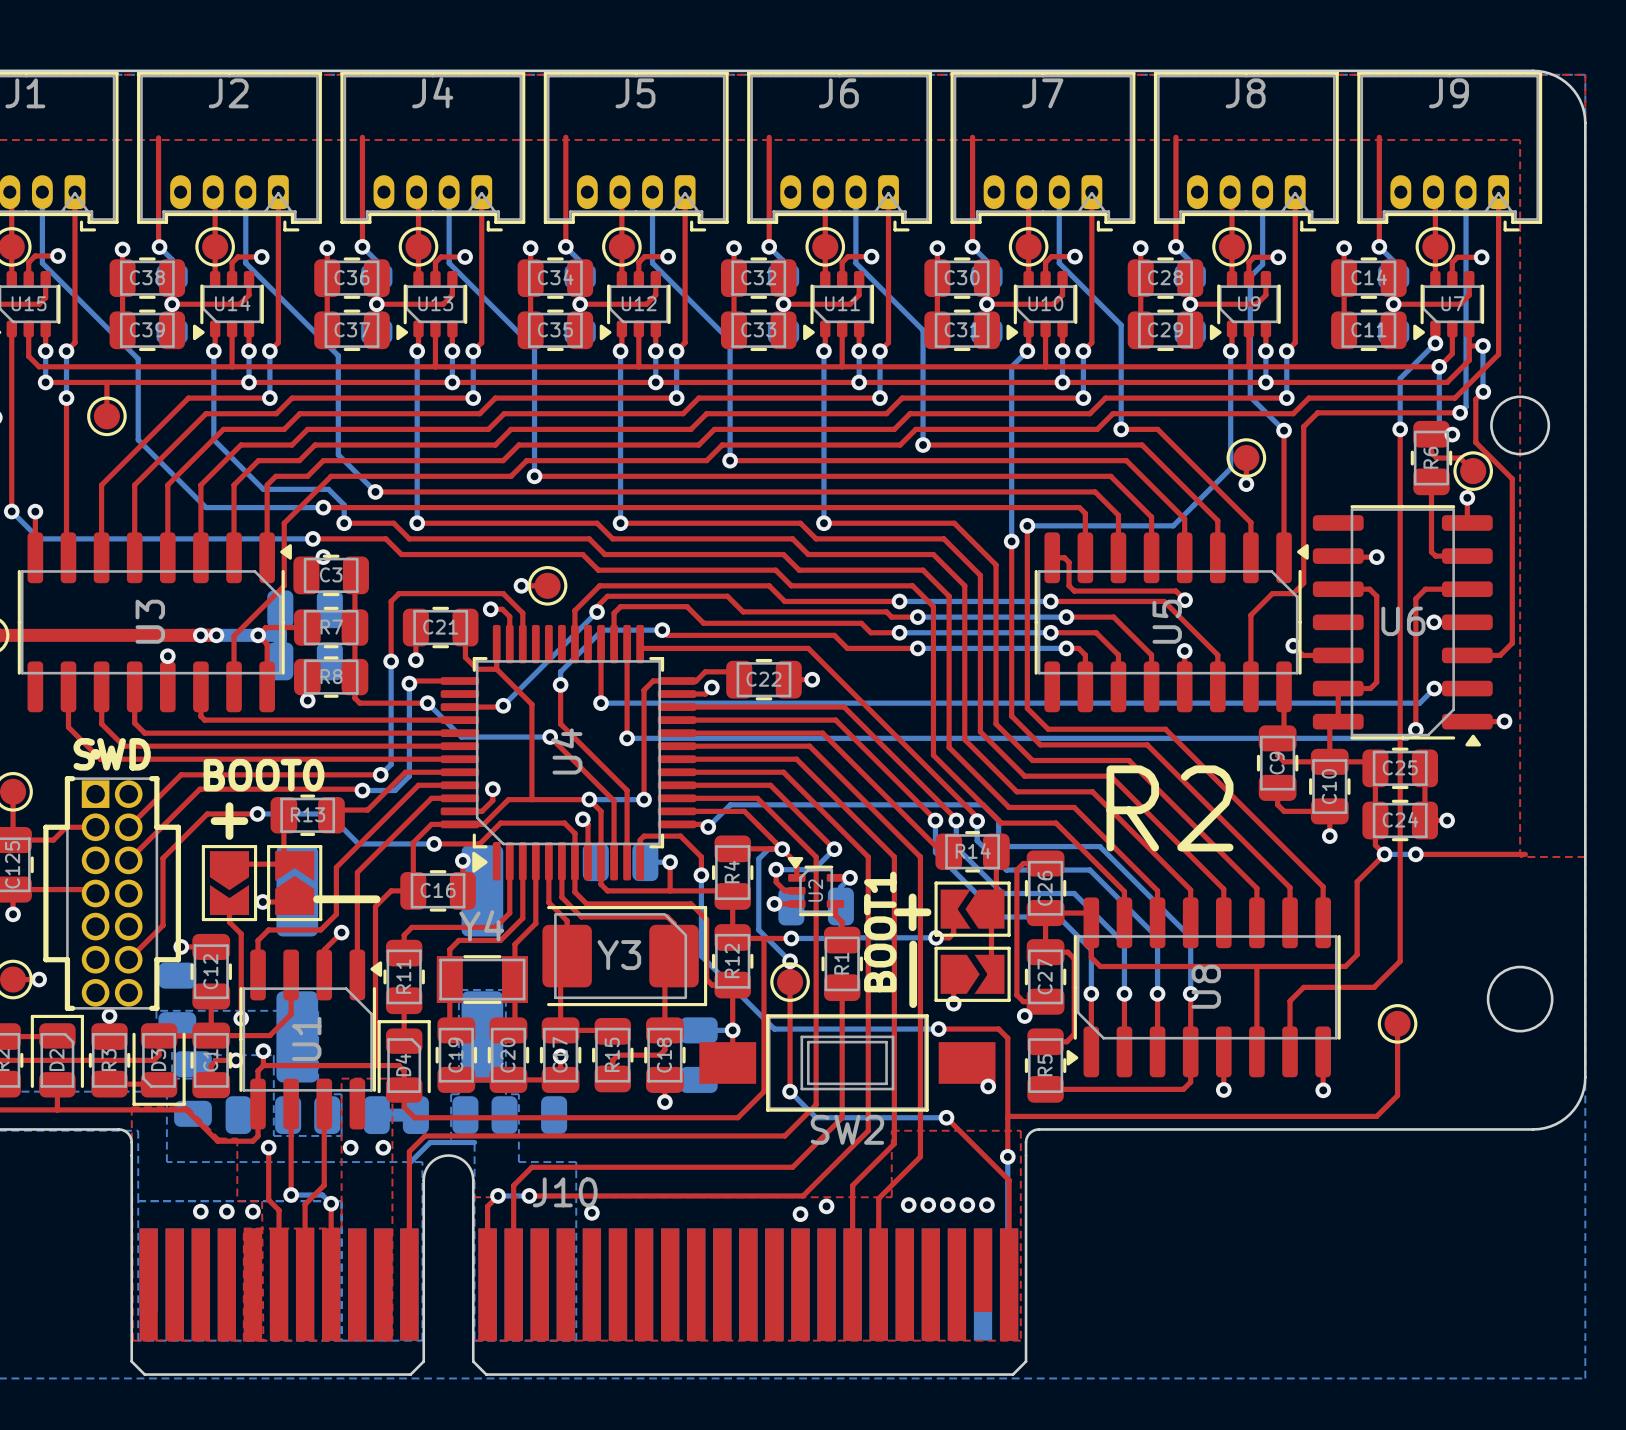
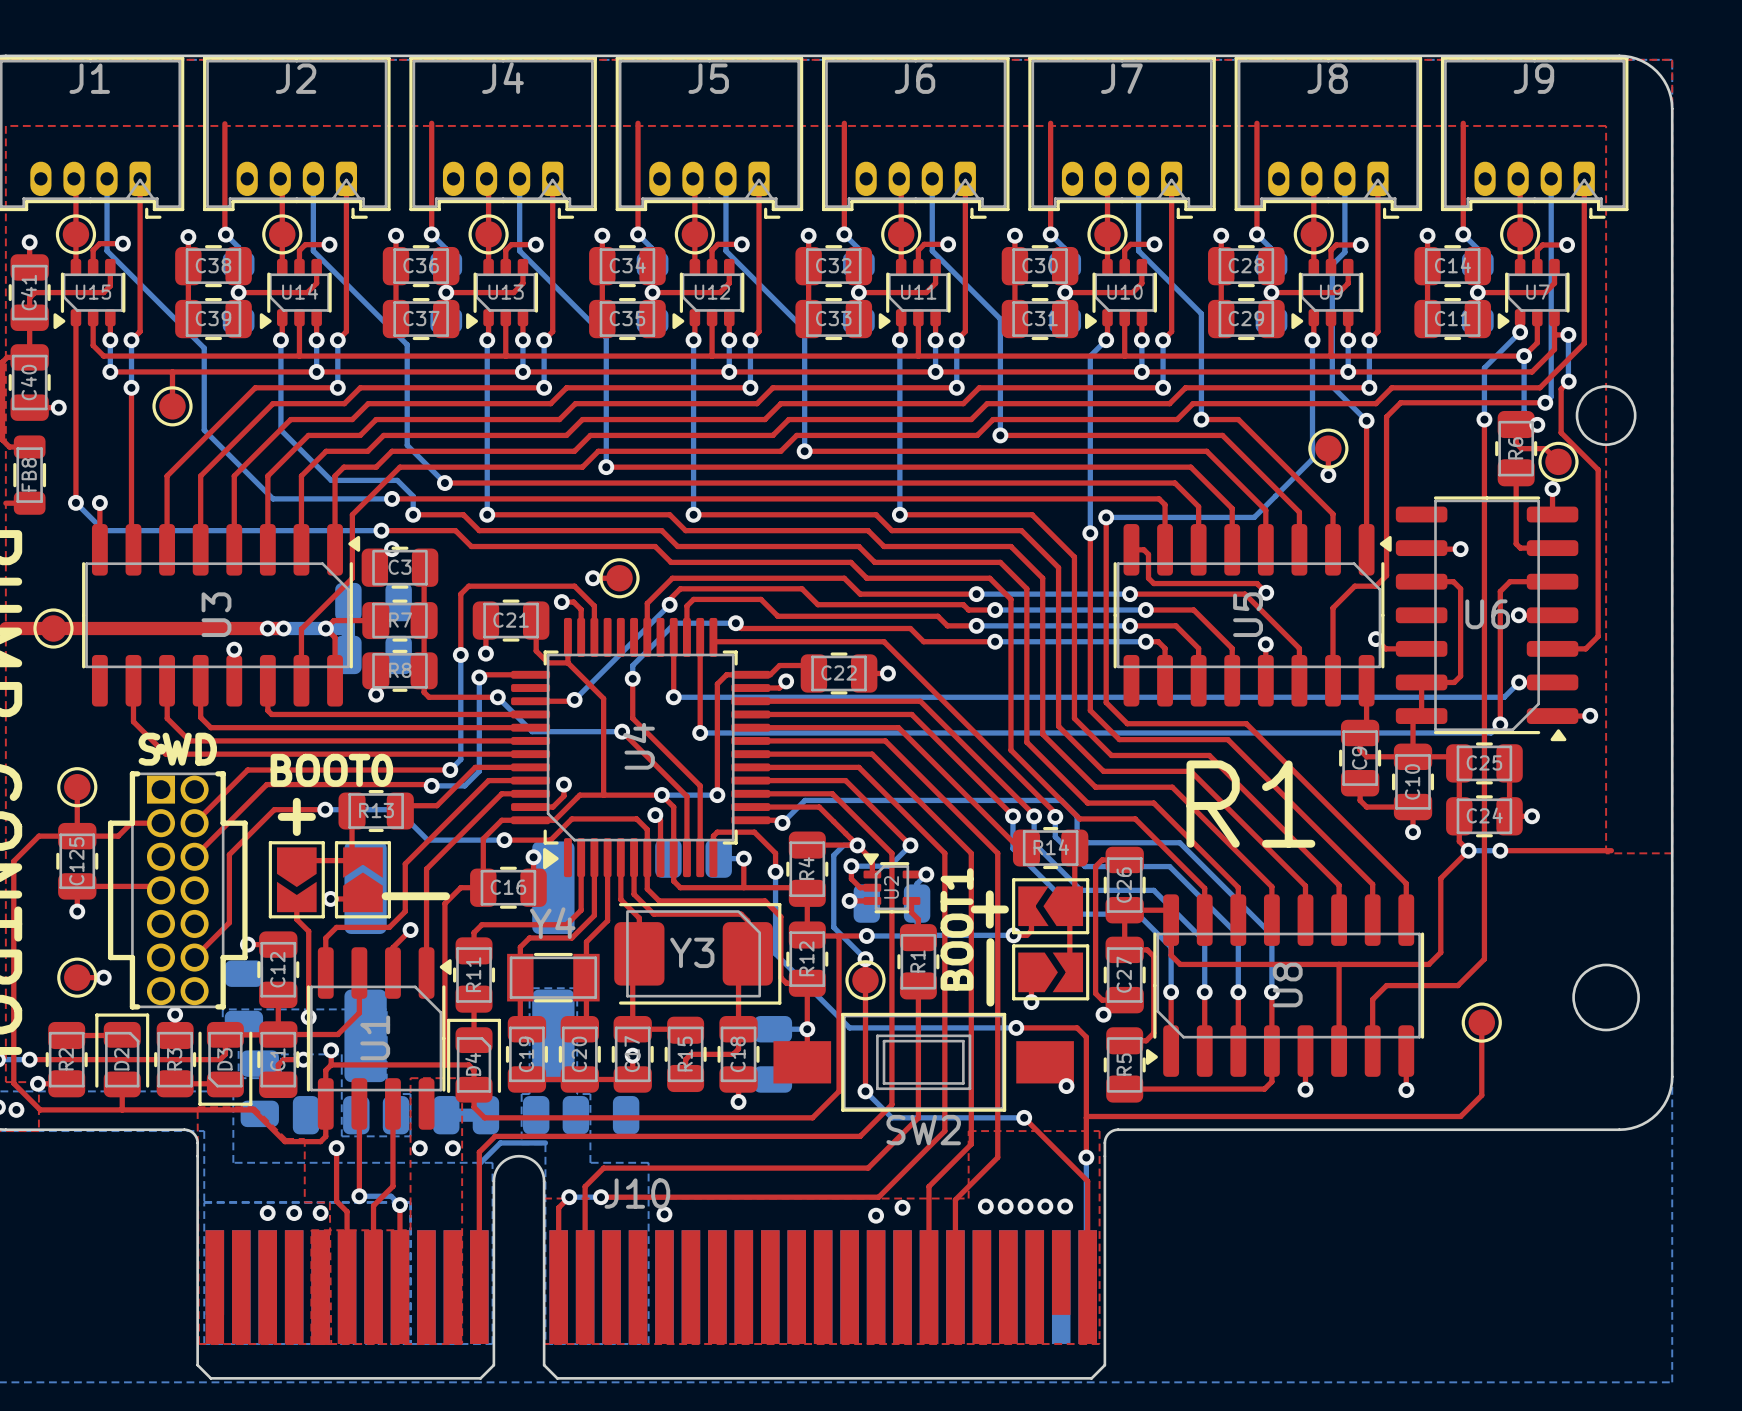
text: R2 (1169, 808) -> R1 (1250, 804)

